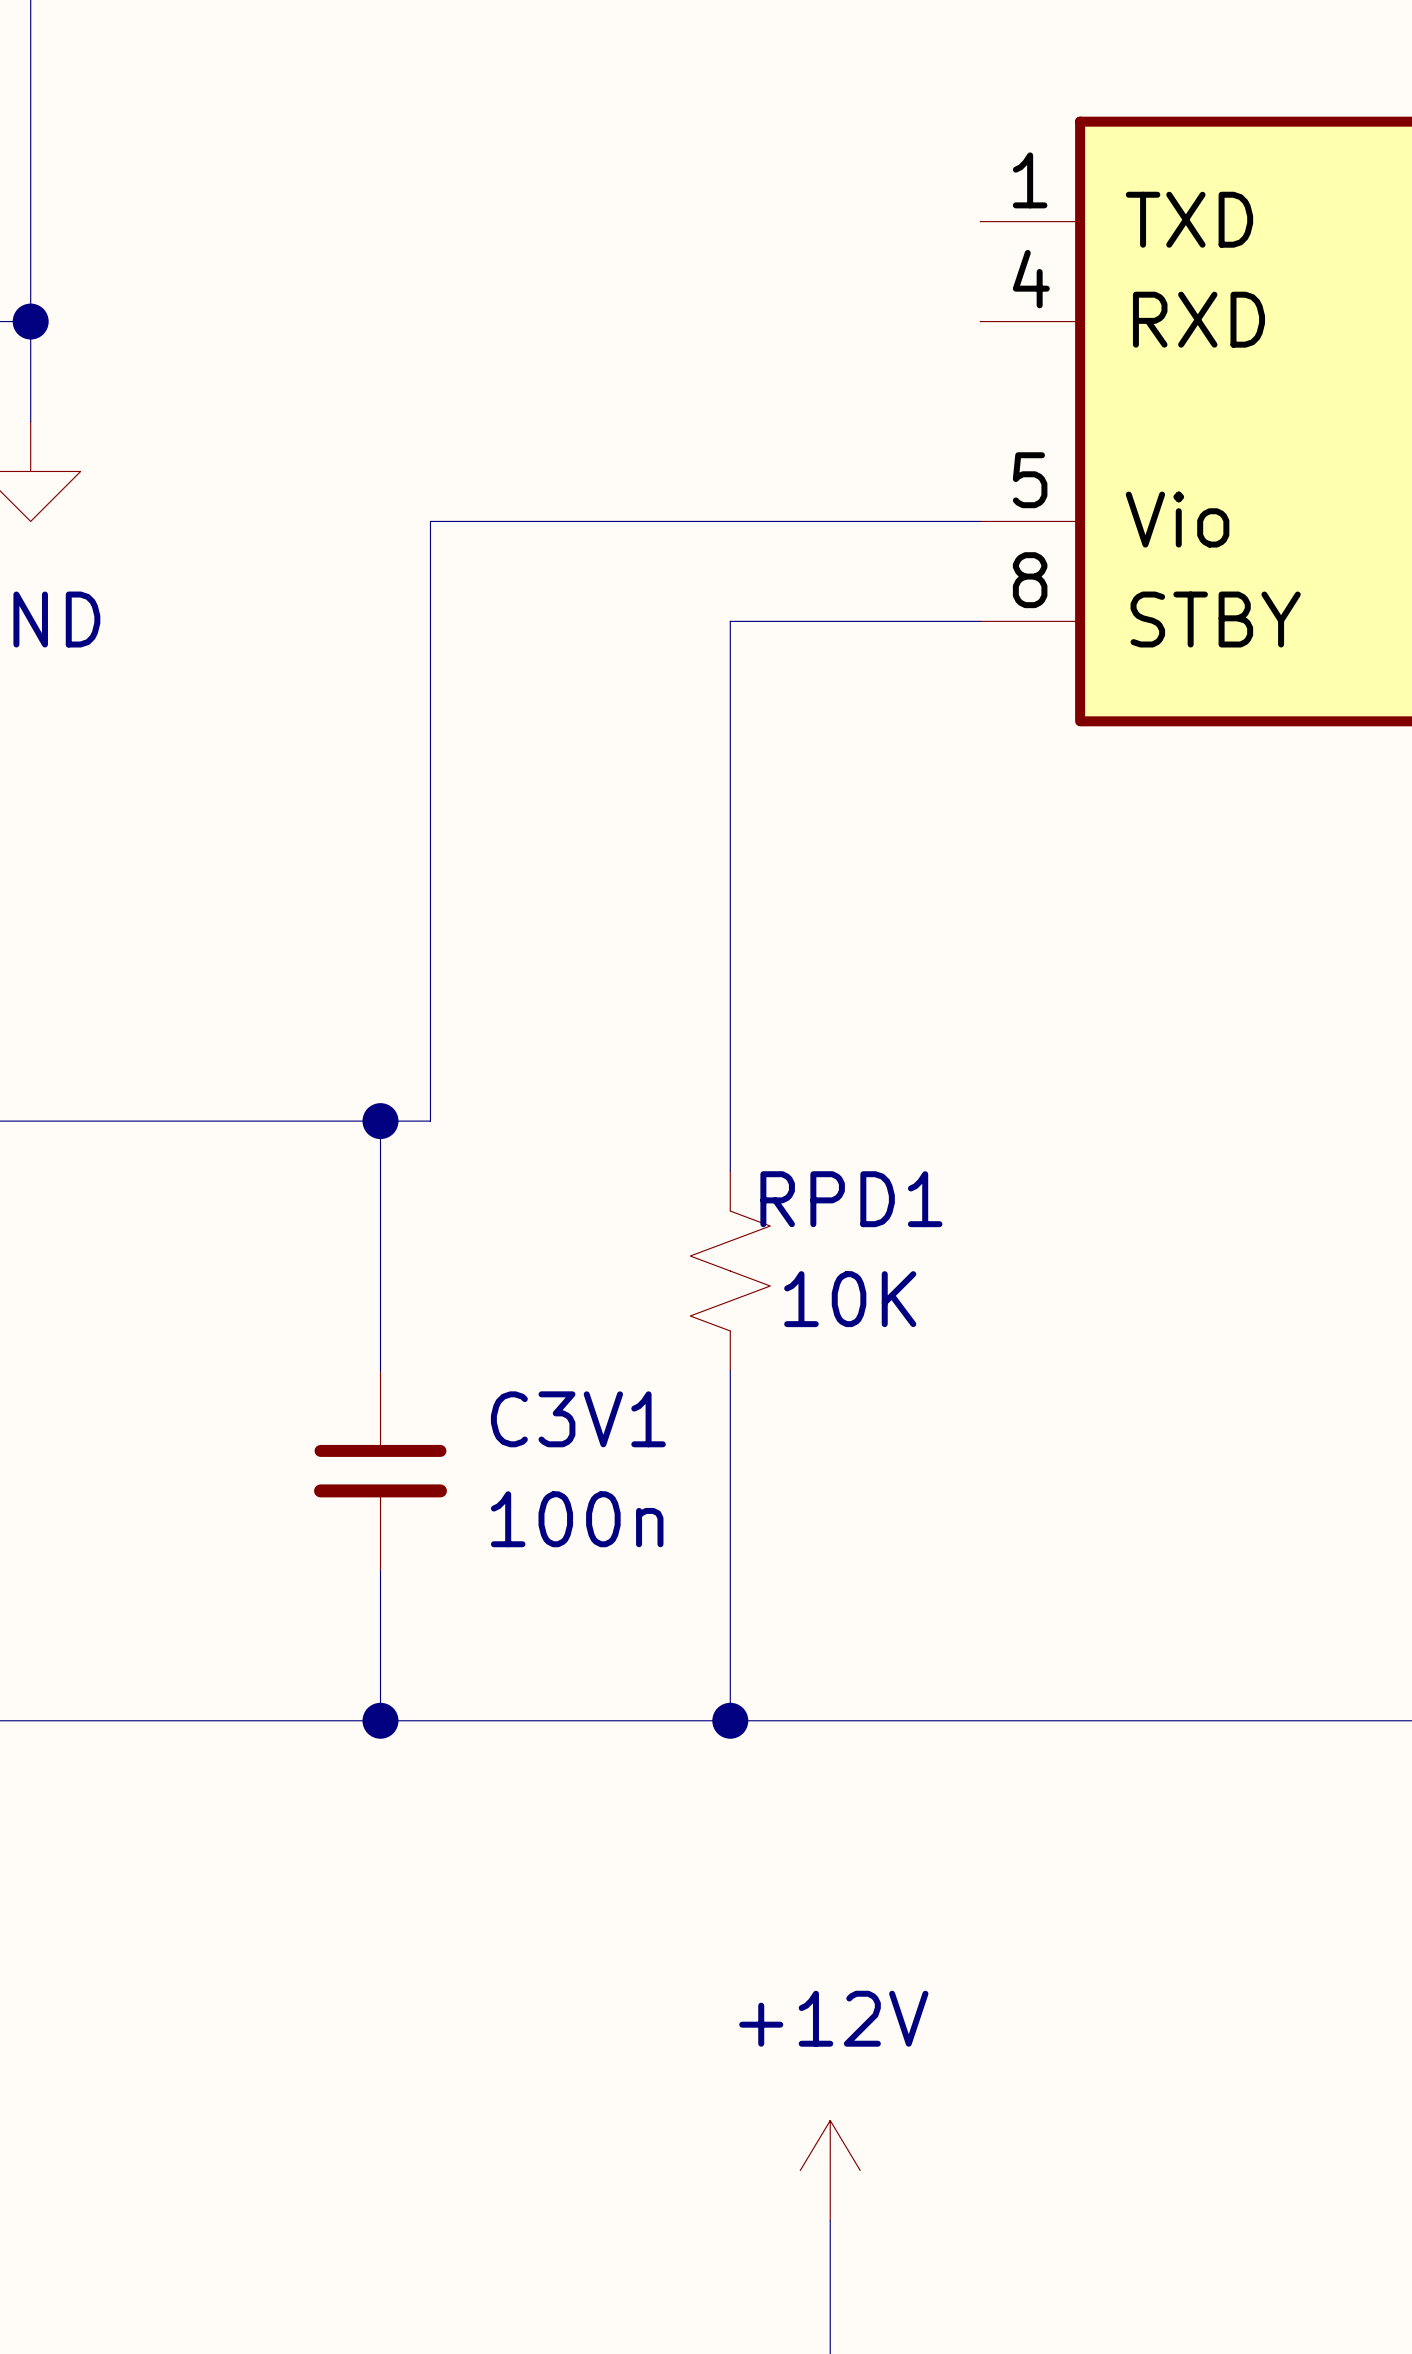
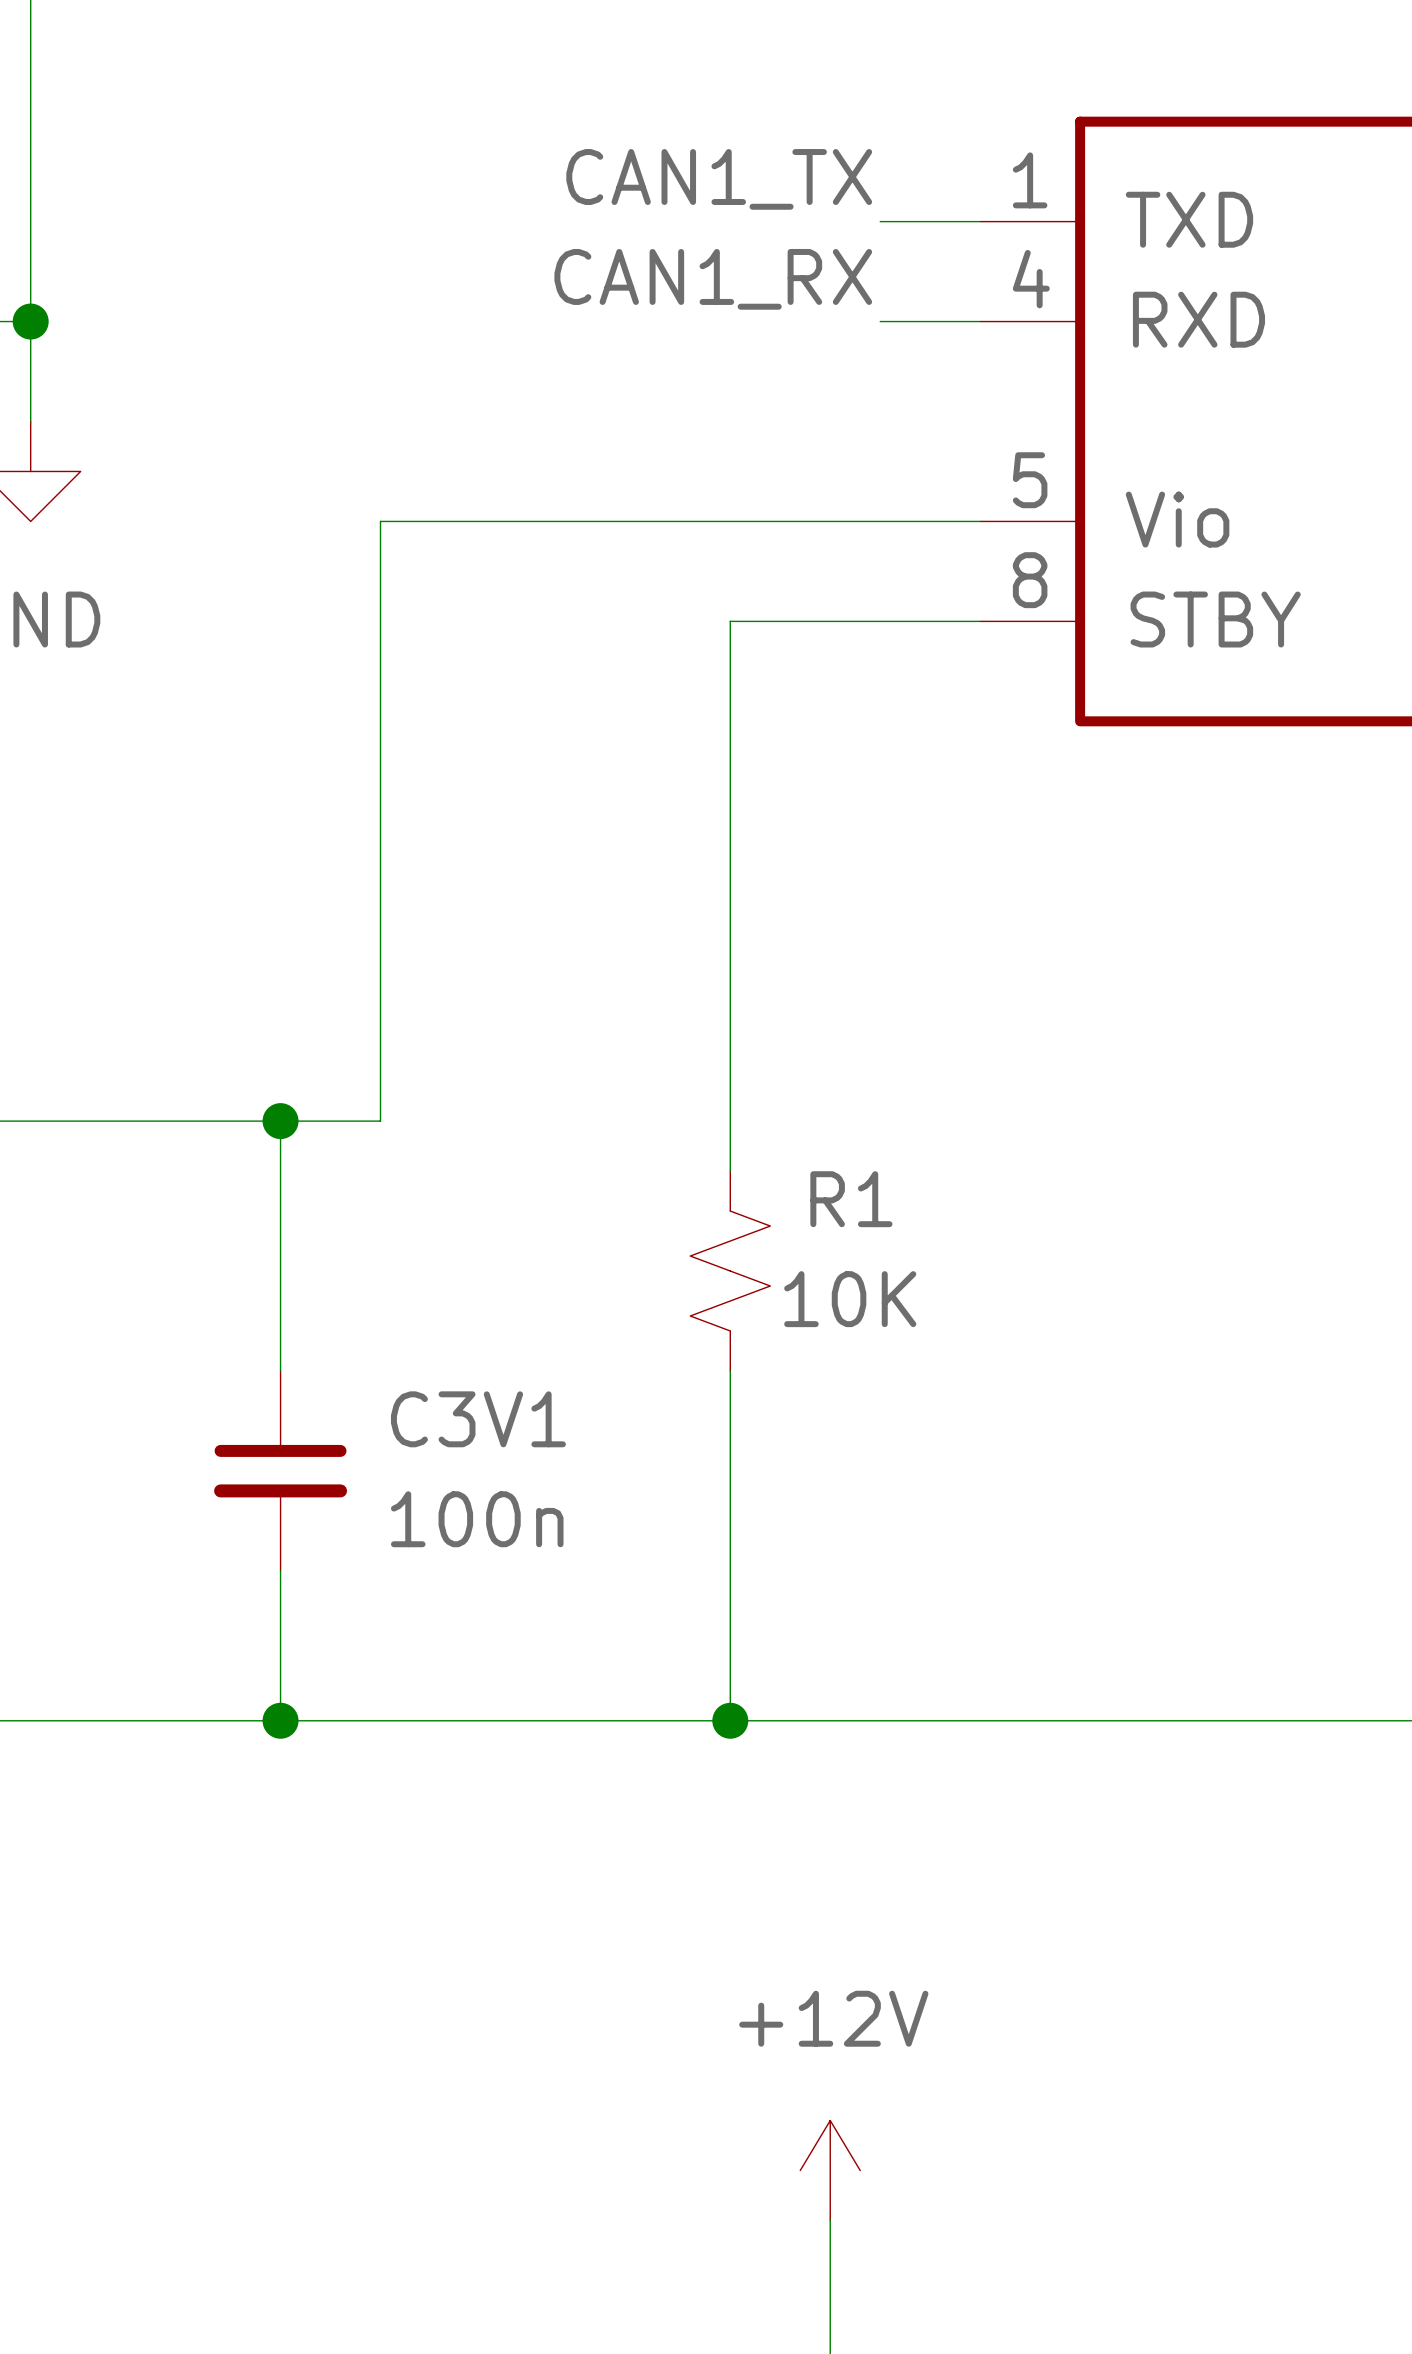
label: none -> CAN1_TX (719, 179)
wire: none -> (880, 221) (980, 221)
label: none -> CAN1_RX (713, 279)
wire: none -> (880, 321) (980, 321)
wire: (430, 521) (430, 1121) (380, 1121) (380, 1370) -> (430, 521) (380, 521) (380, 1121)
wire: none -> (280, 1121) (280, 1370)
junction position: (380, 1121) -> (280, 1121)
RPD1 name: RPD1 (851, 1199) -> R1 (851, 1199)
C3V1 position: (380, 1470) -> (280, 1470)
wire: (380, 1570) (380, 1720) -> (280, 1570) (280, 1720)
junction position: (380, 1720) -> (280, 1720)

